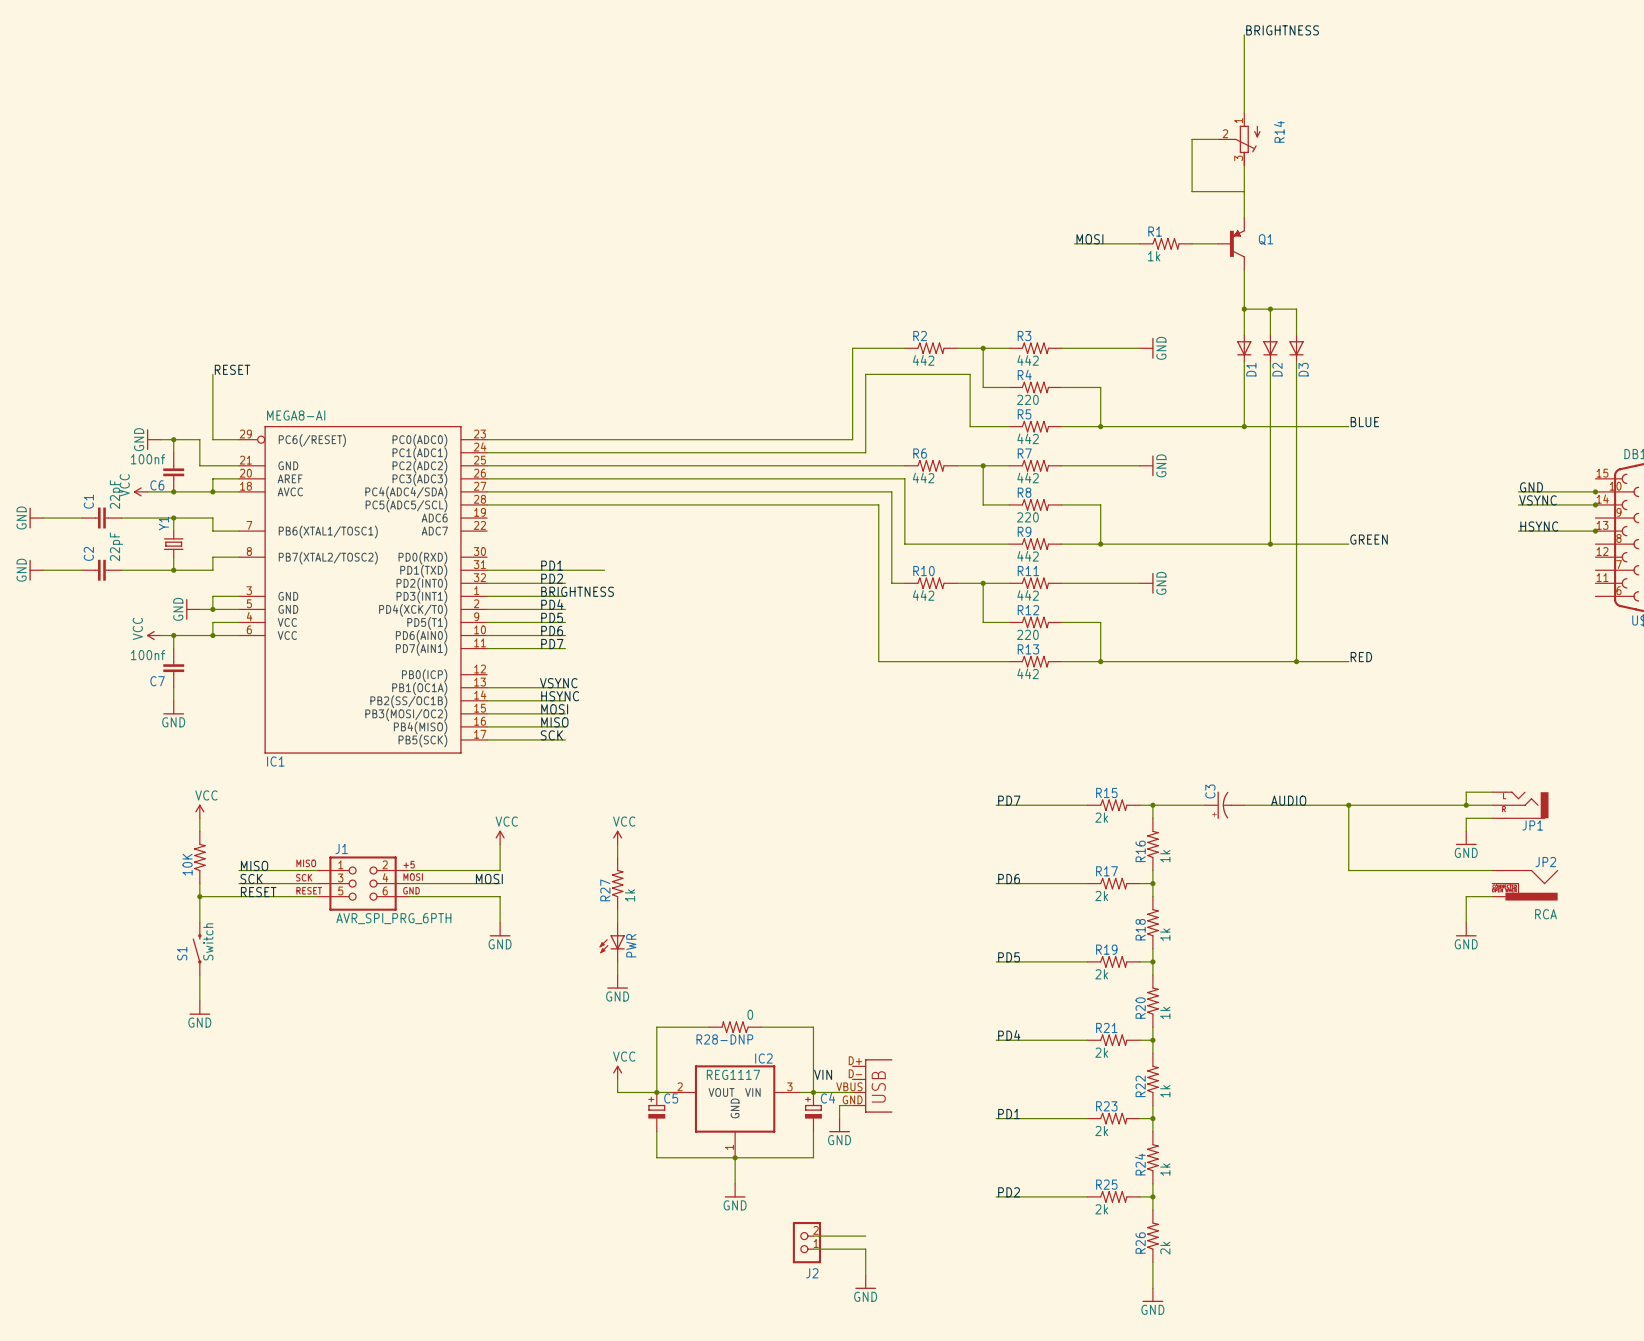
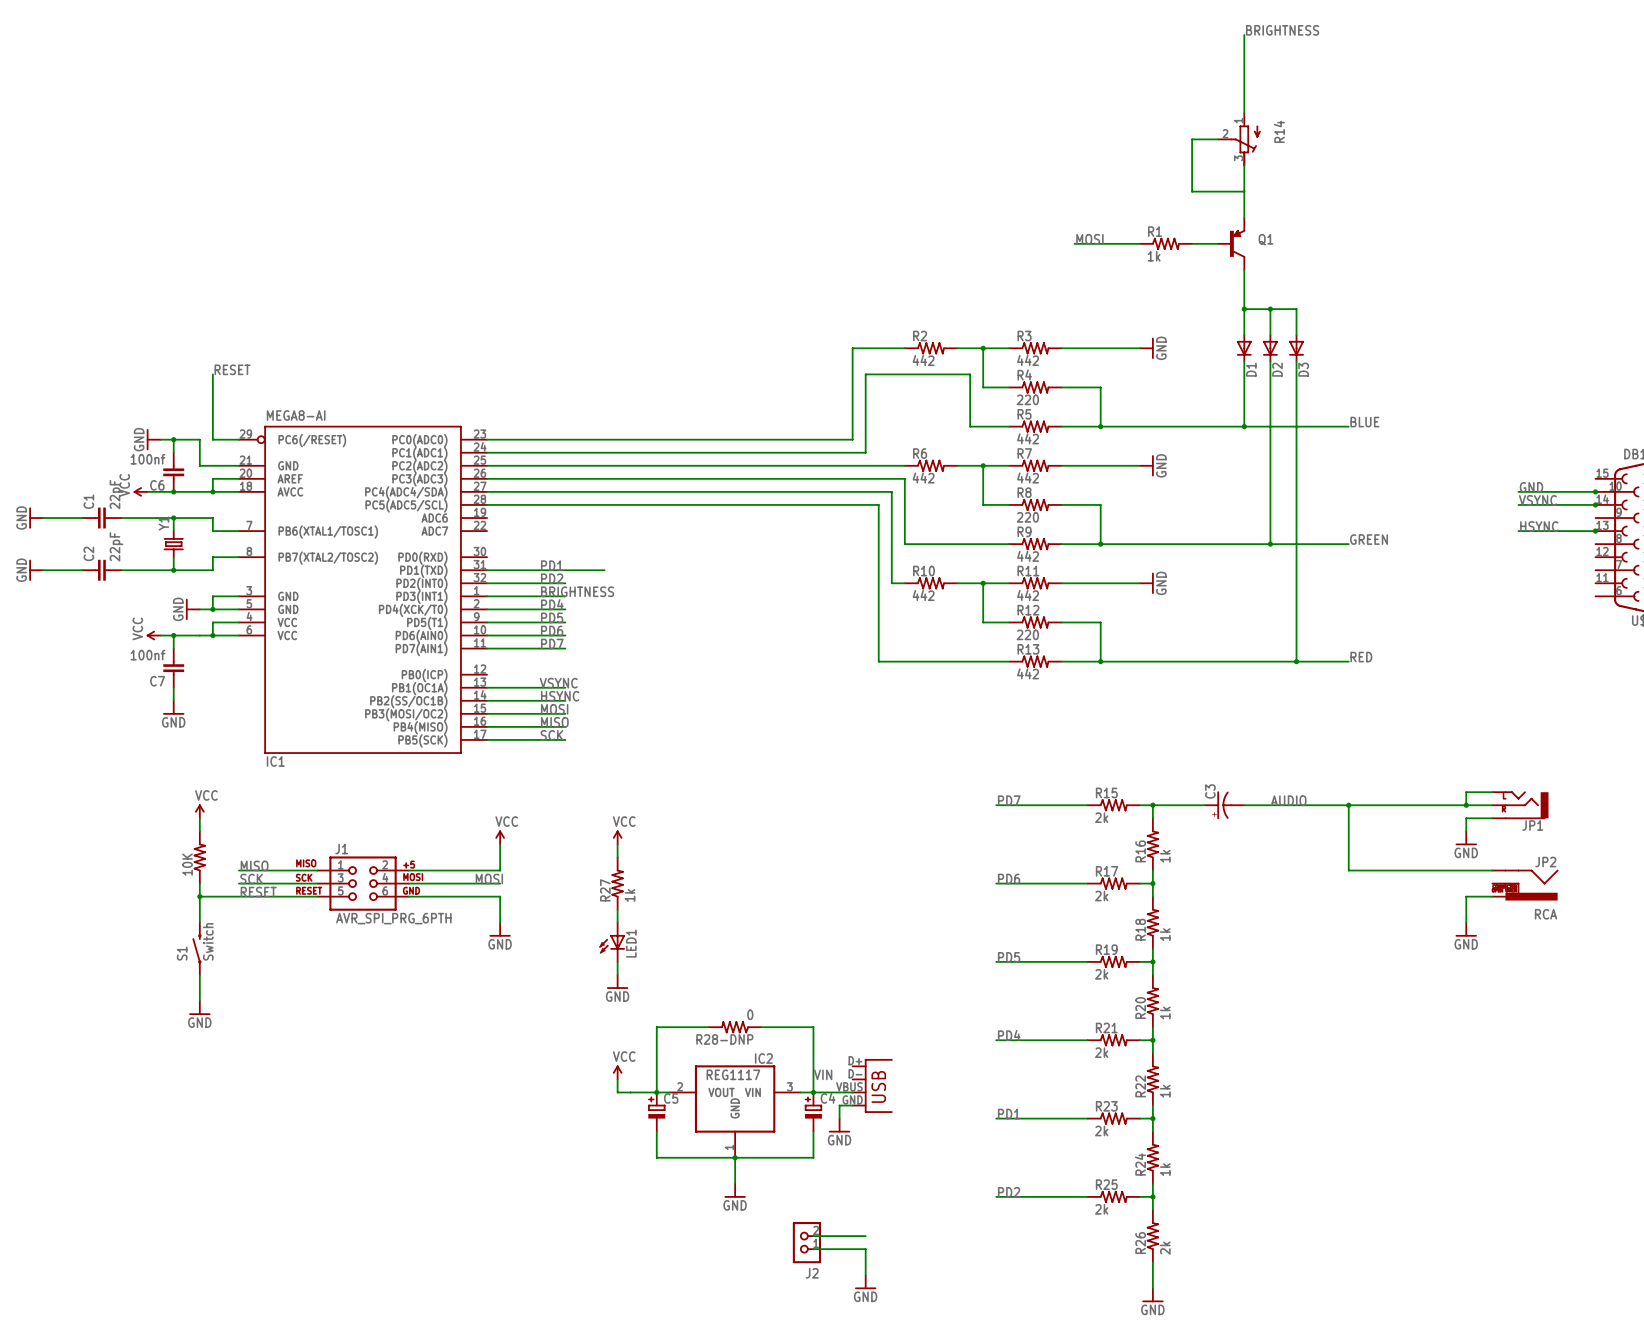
PWR name: PWR (631, 945) -> LED1 (631, 943)

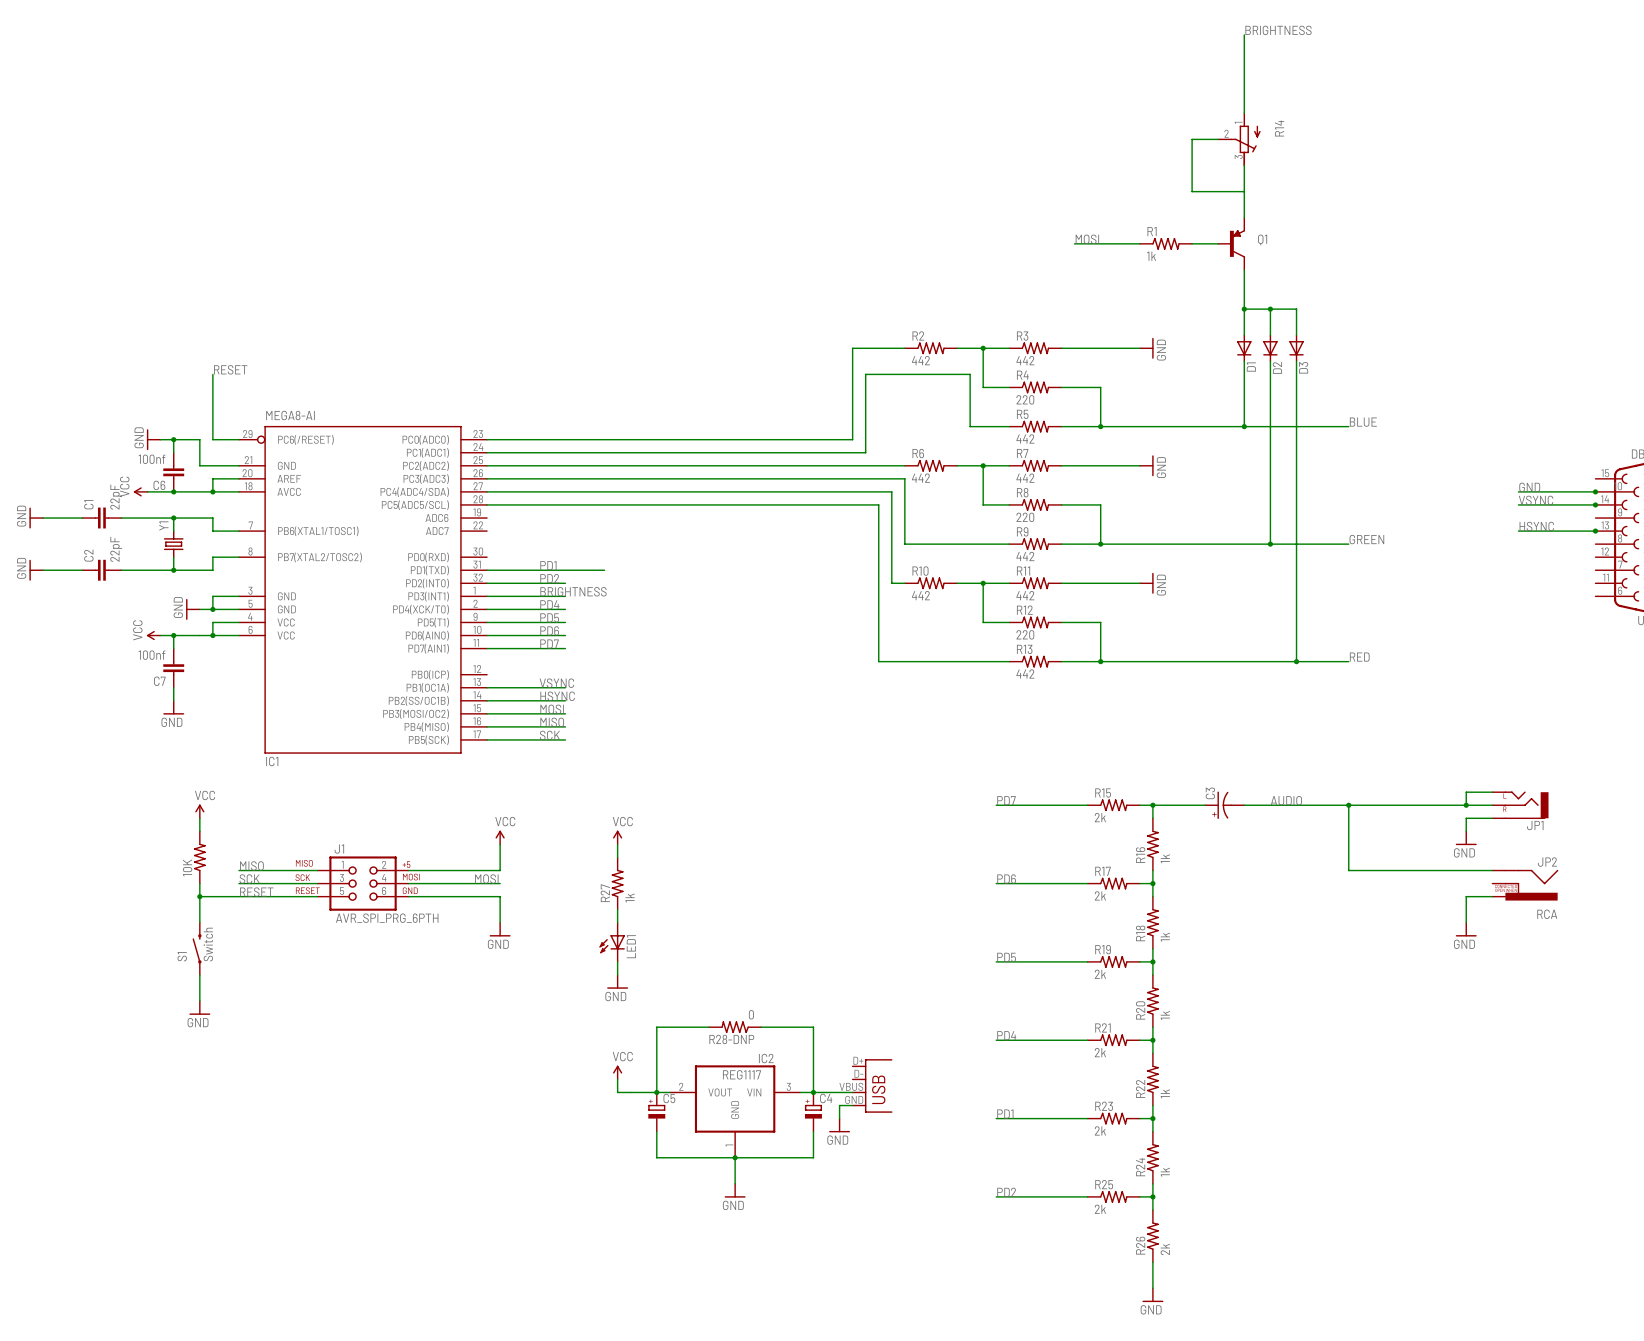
label: VIN (823, 1074) -> none
wire: (813, 1236) (865, 1236) -> none
J2: (806, 1242) -> none
wire: (813, 1249) (865, 1249) (865, 1275) -> none
power symbol: GND (865, 1282) -> none

